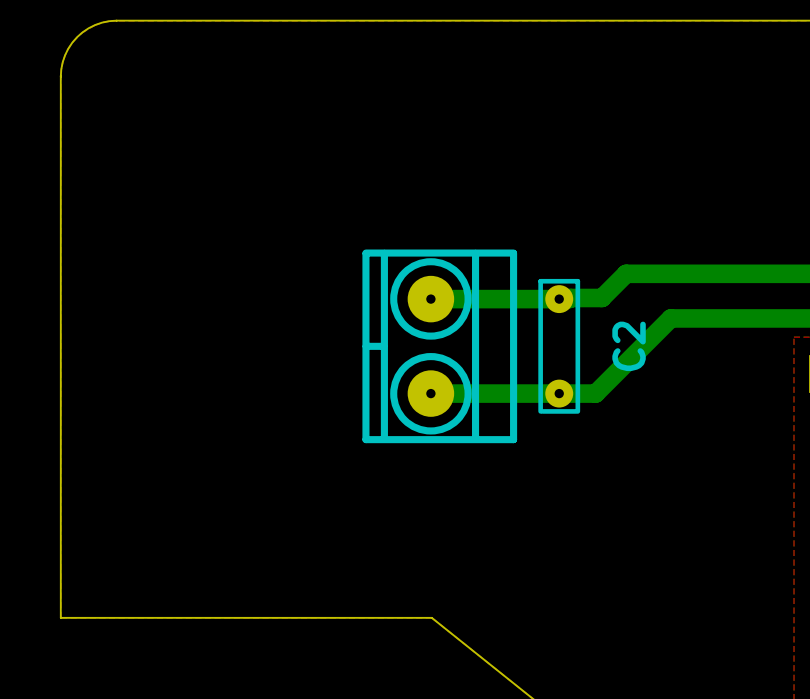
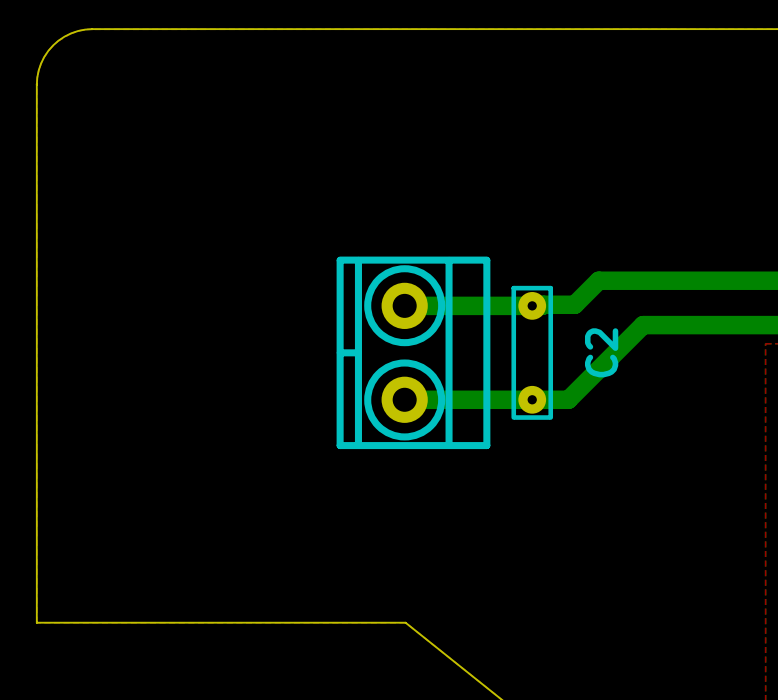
part footprint: [362, 249, 518, 444] -> [336, 256, 491, 450]

